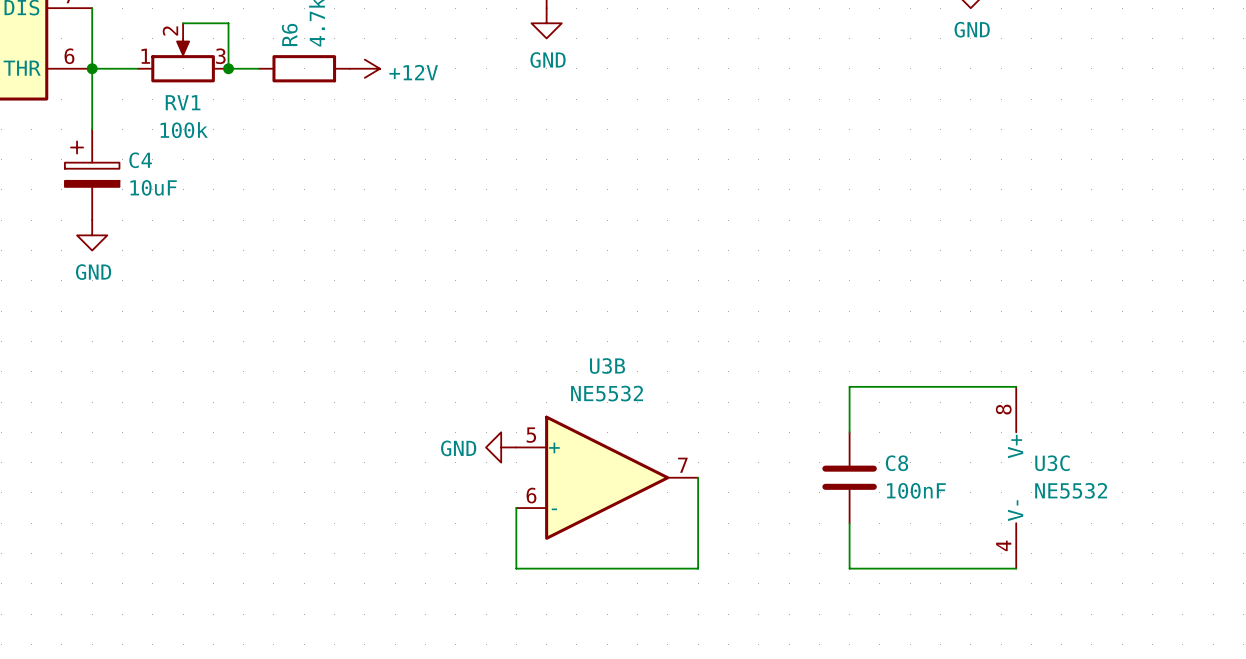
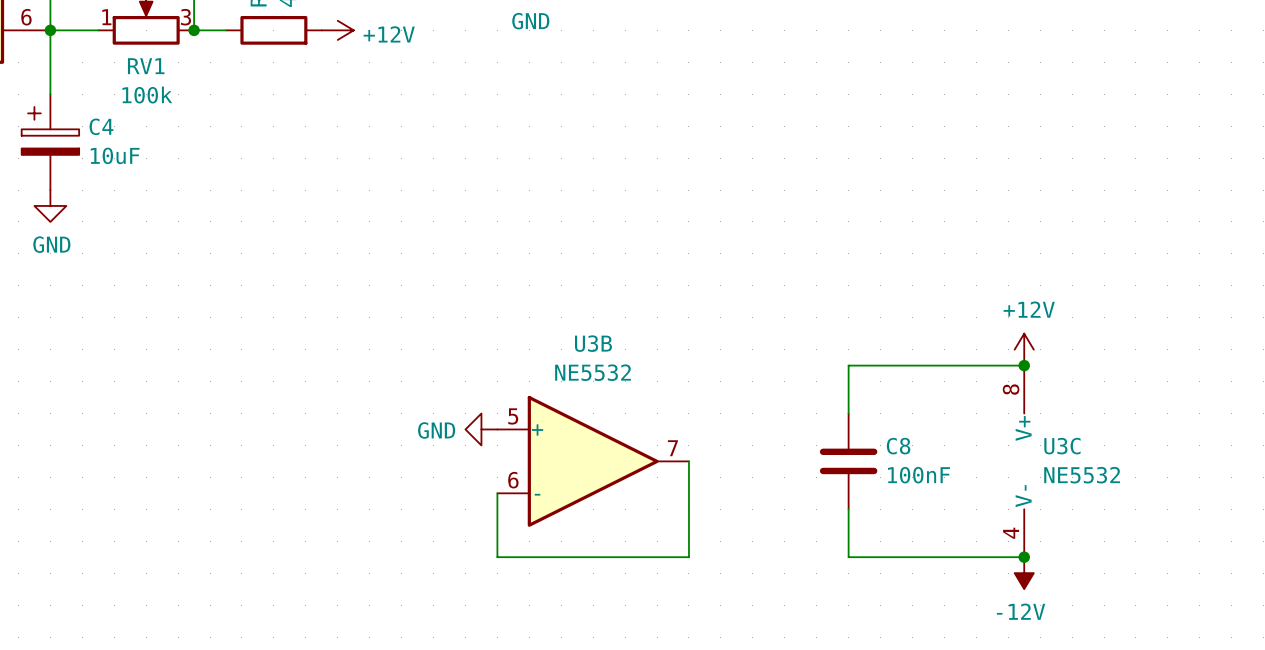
power symbol: none -> +12V (1024, 349)
junction: none -> (1024, 365)
junction: none -> (1024, 557)
power symbol: none -> -12V (1024, 573)

